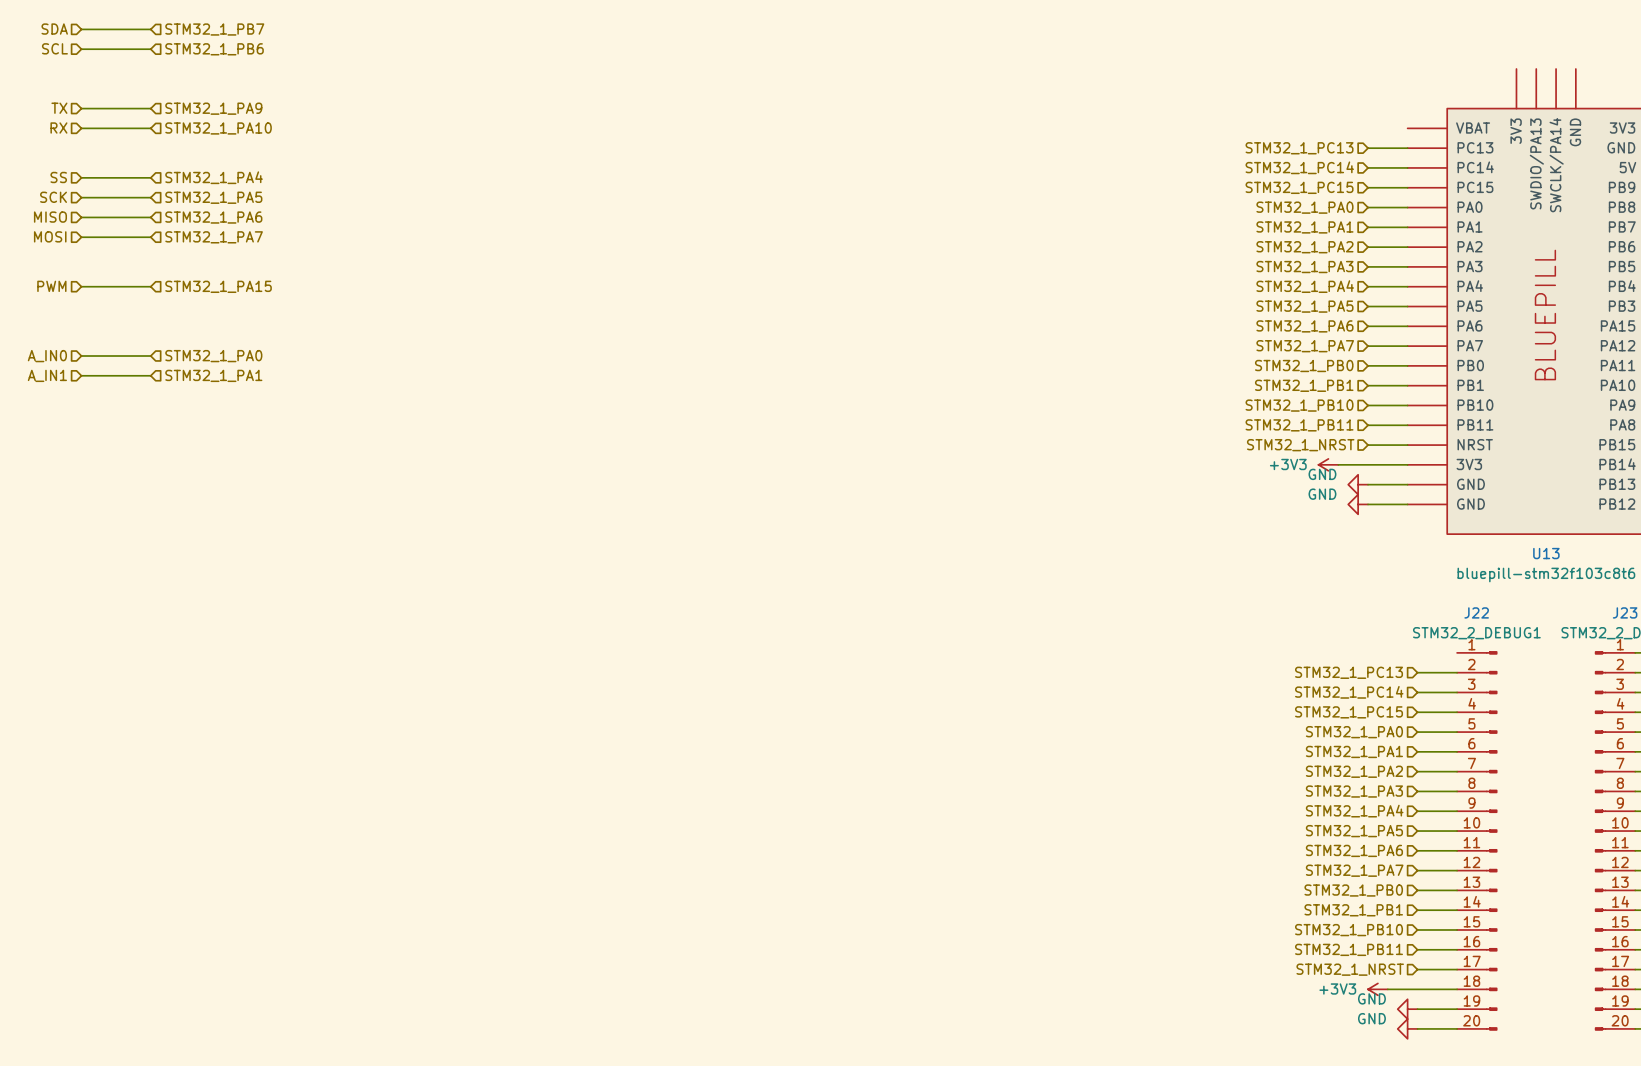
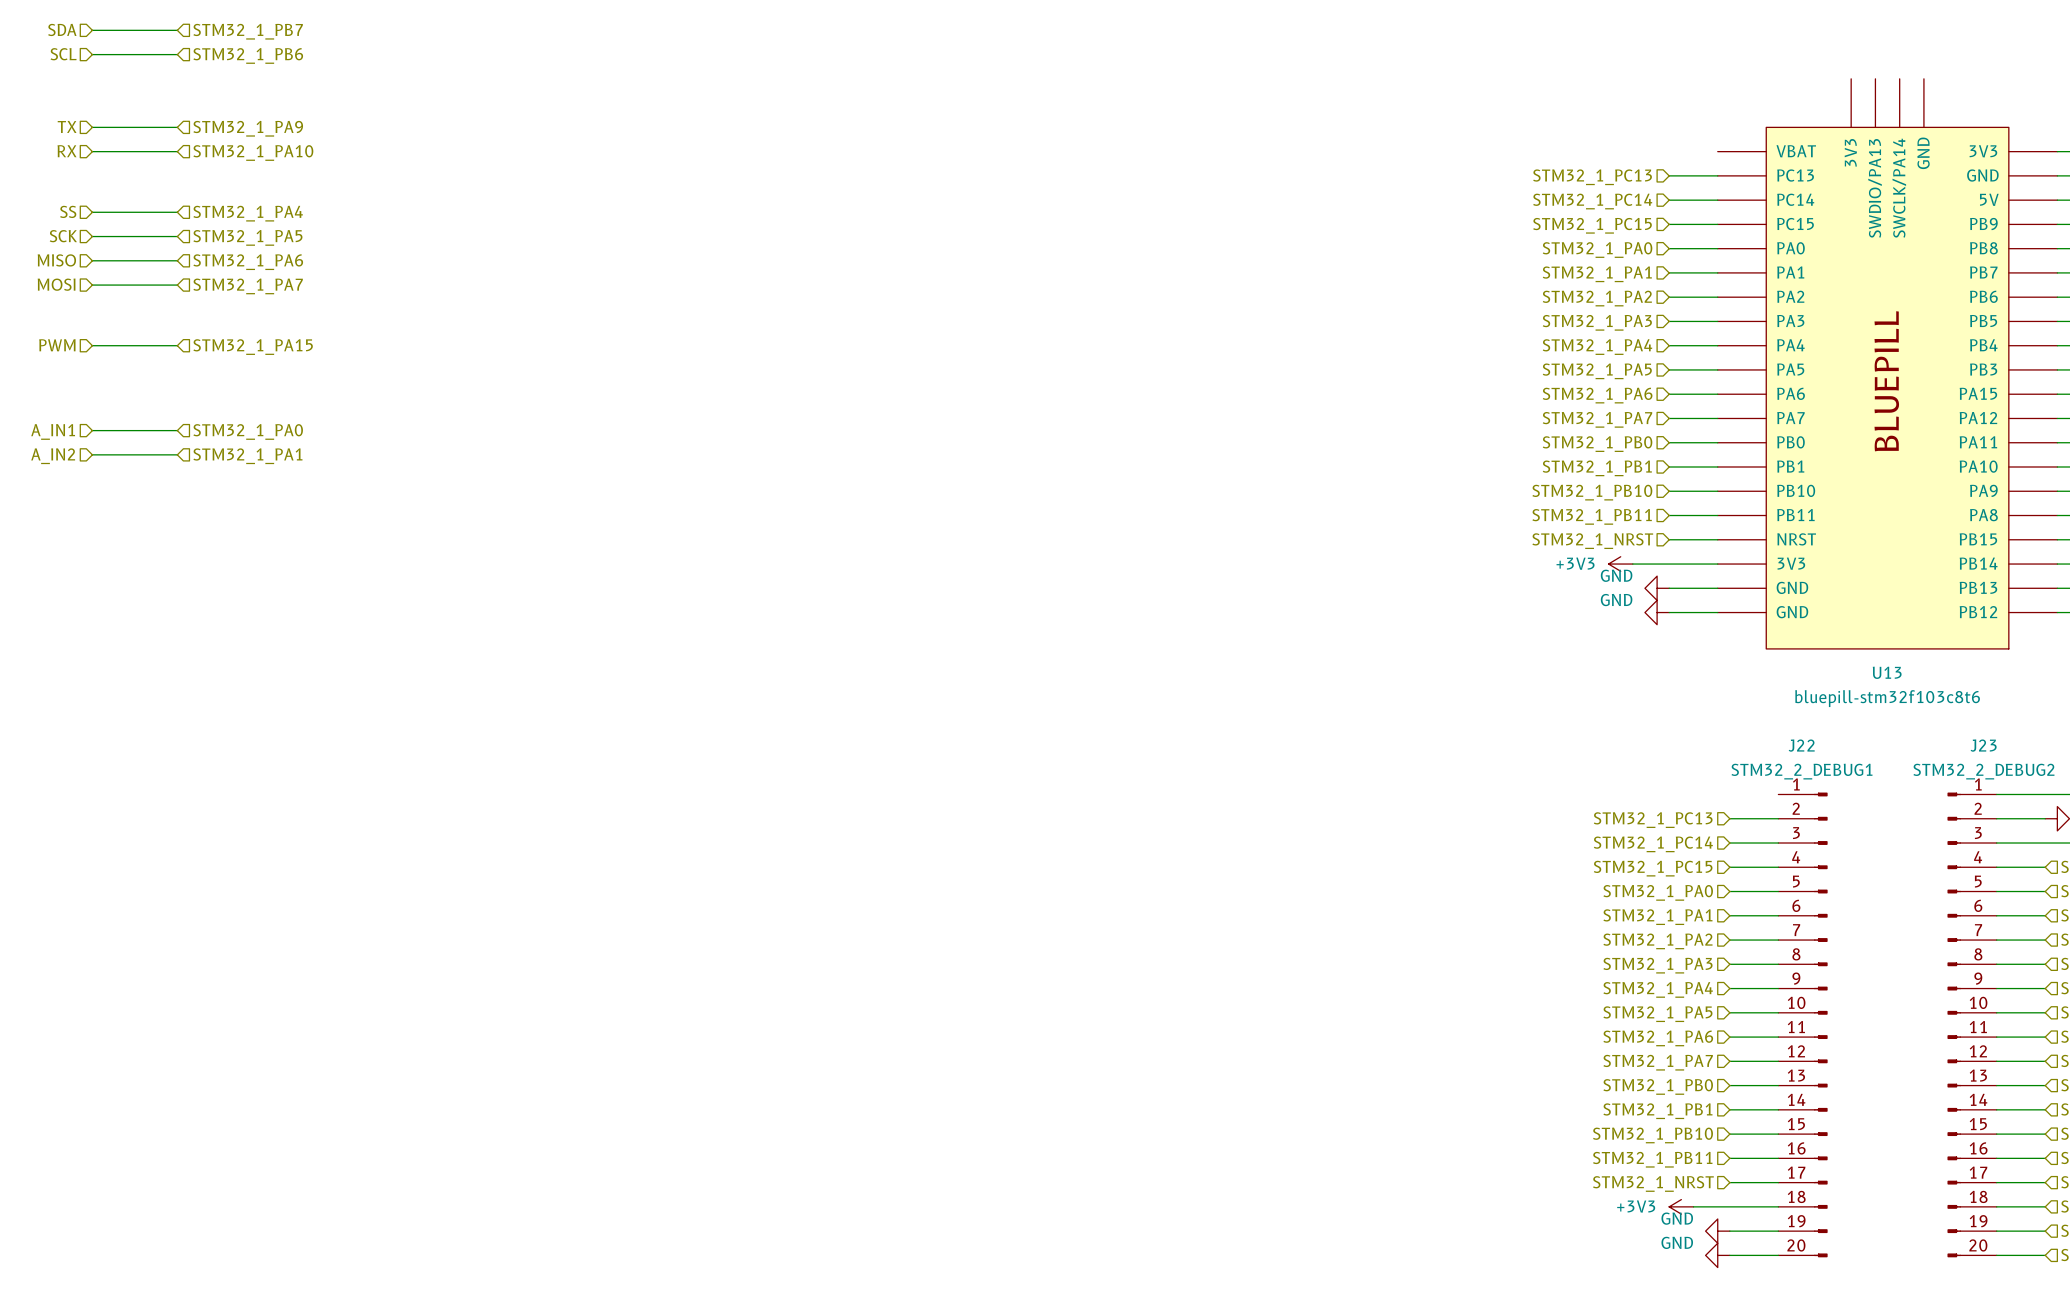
hierarchical label: A_IN0 (47, 356) -> A_IN1 (53, 431)
hierarchical label: A_IN1 (47, 375) -> A_IN2 (53, 456)

